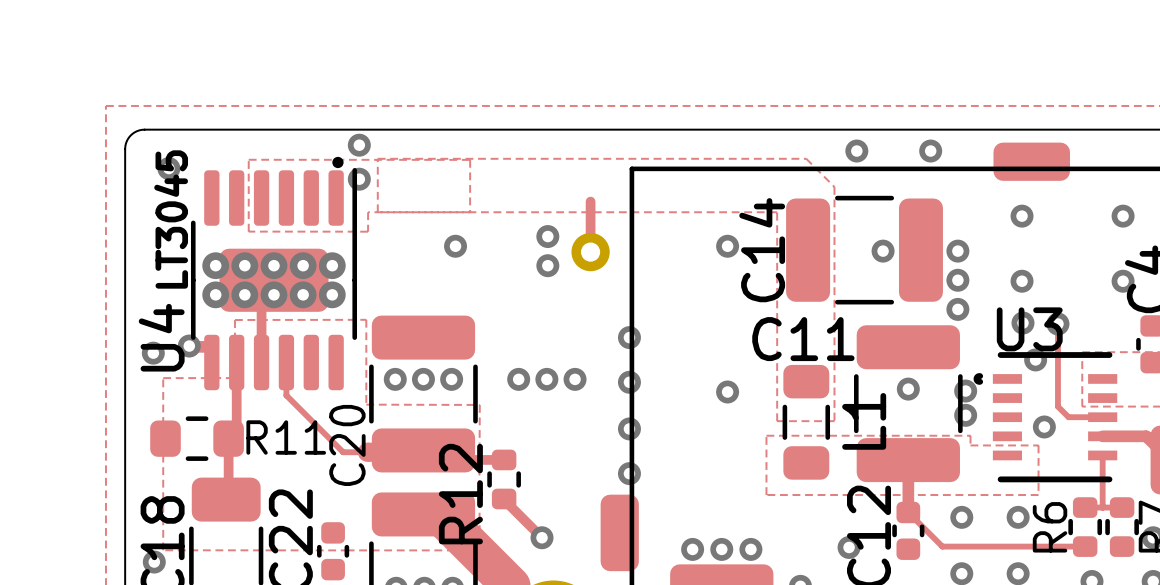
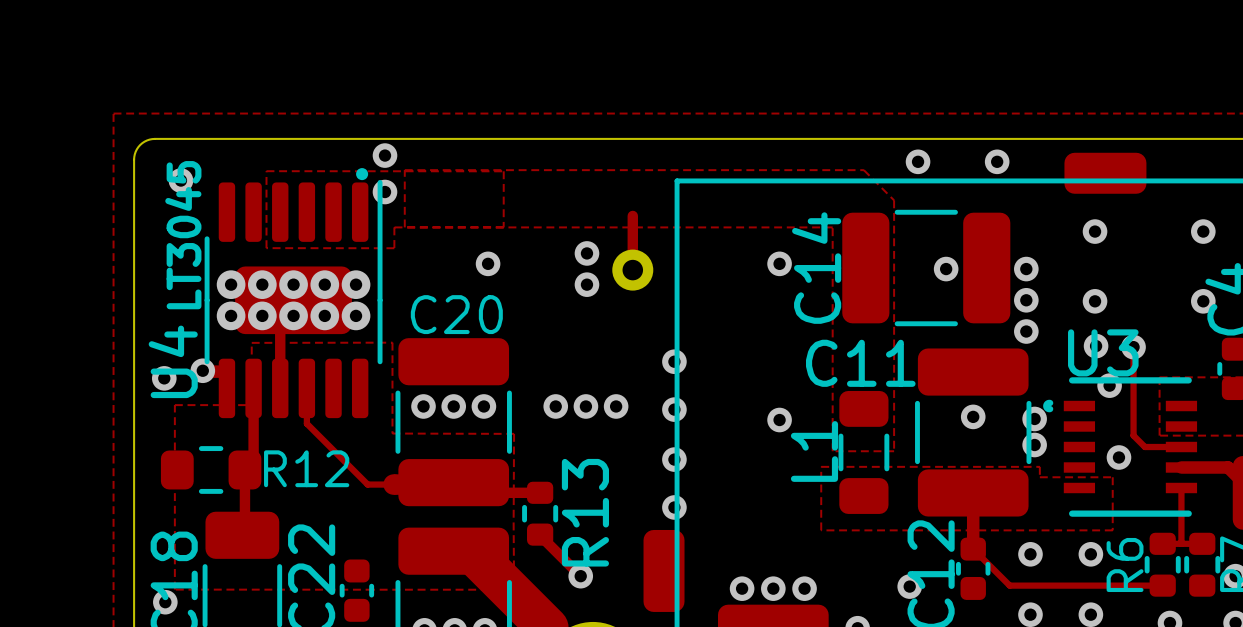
L1 name position: L1 (864, 421) -> L1 (814, 451)
R11 name: R11 (286, 437) -> R12 (306, 468)
C20 name rotation: 0° (347, 445) -> 90° clockwise (456, 314)
C20 name position: C20 (347, 445) -> C20 (456, 314)
R12 name: R12 (460, 494) -> R13 (585, 512)

